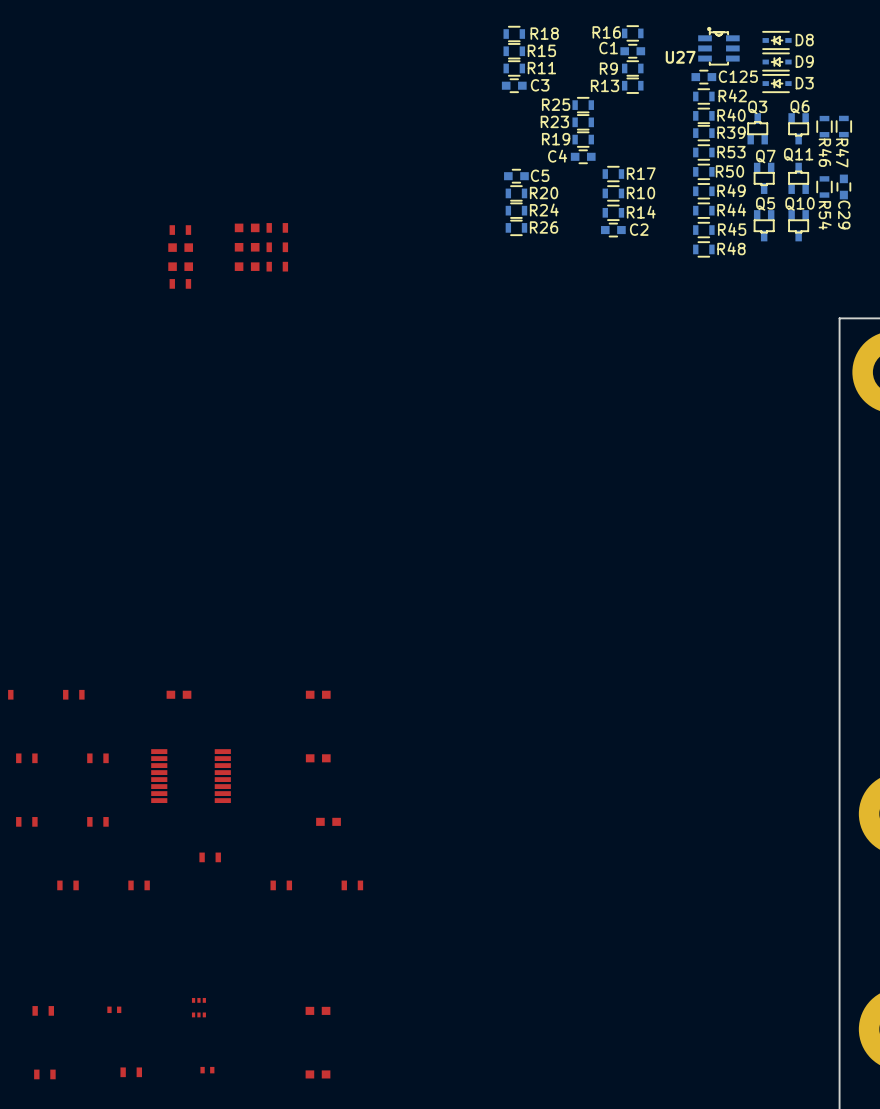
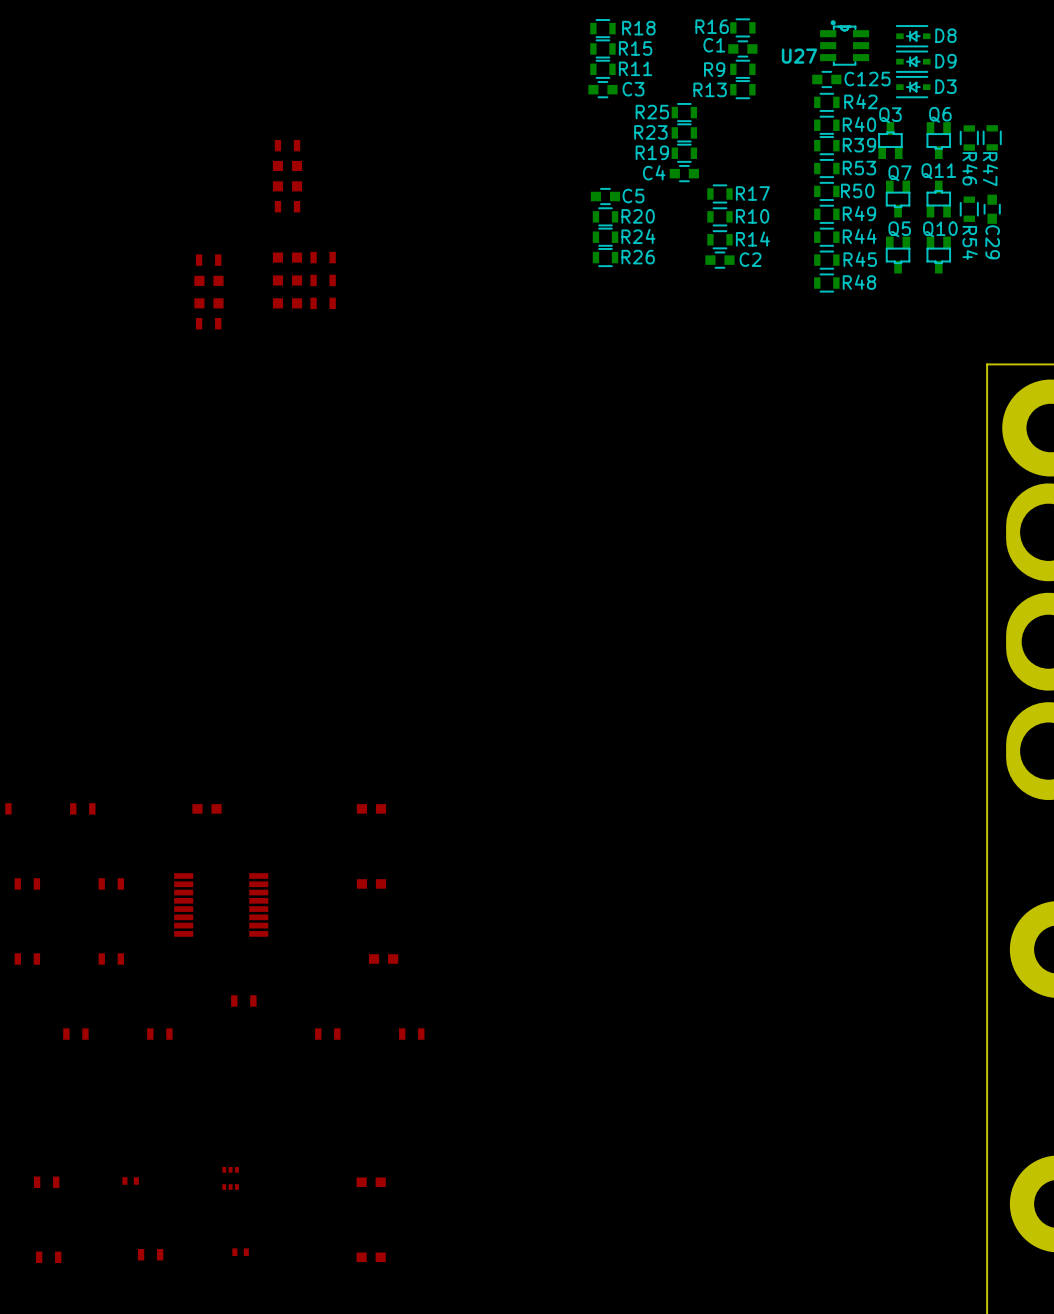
part: none -> (287, 145)
part: none -> (287, 165)
part: none -> (287, 186)
part: none -> (287, 206)

